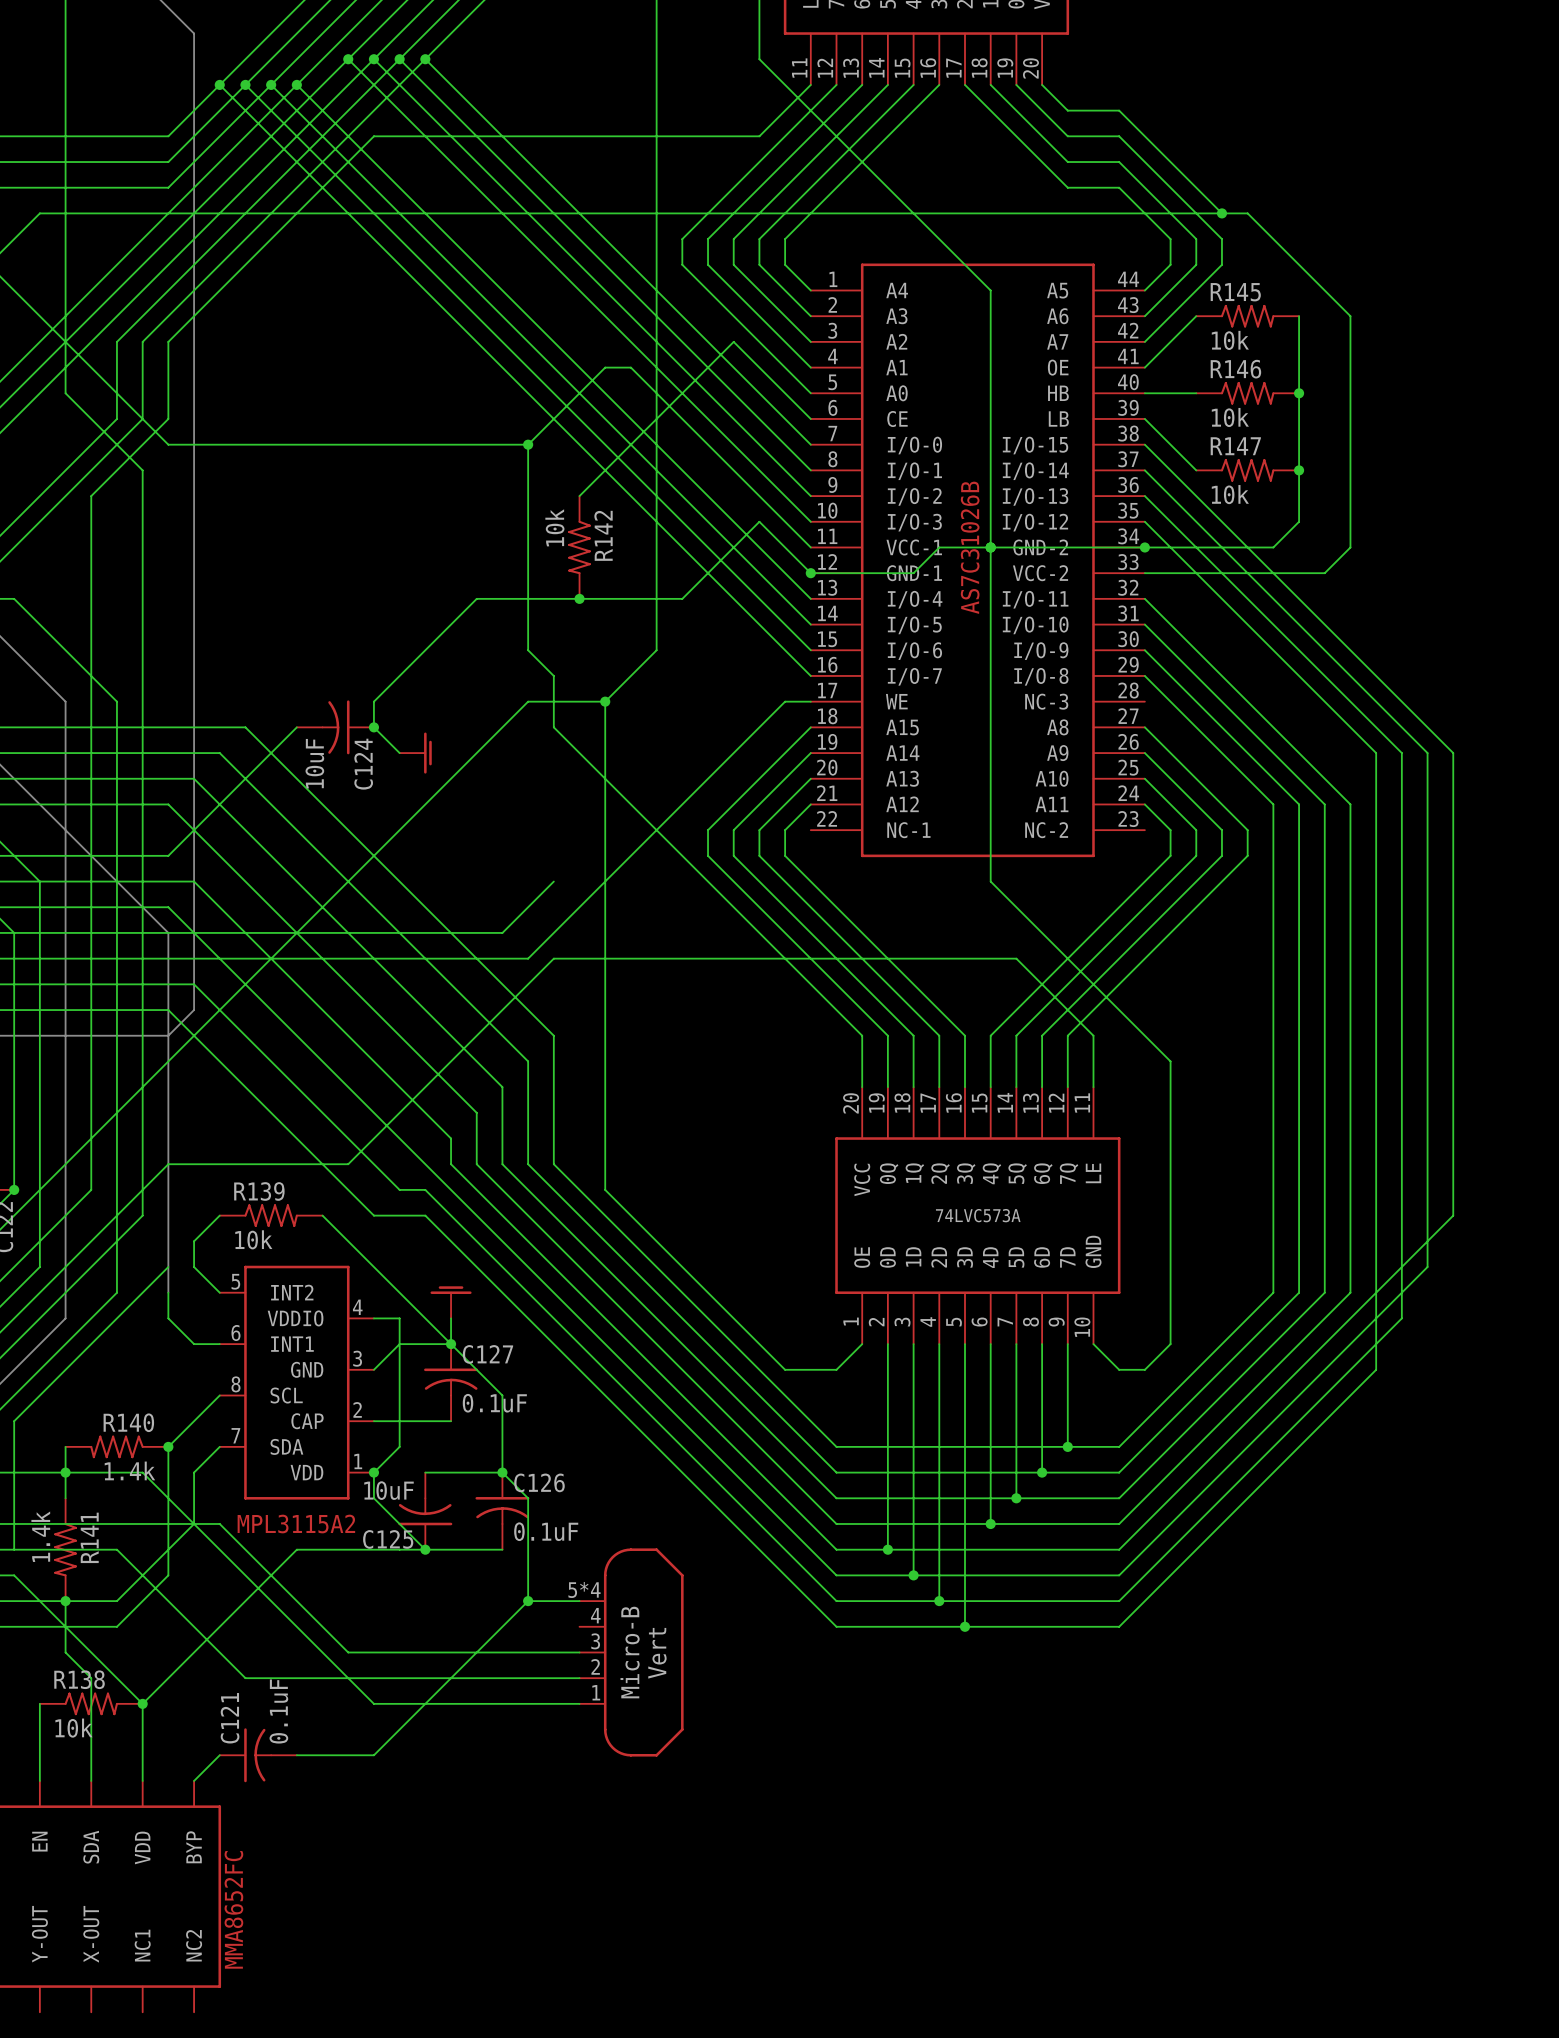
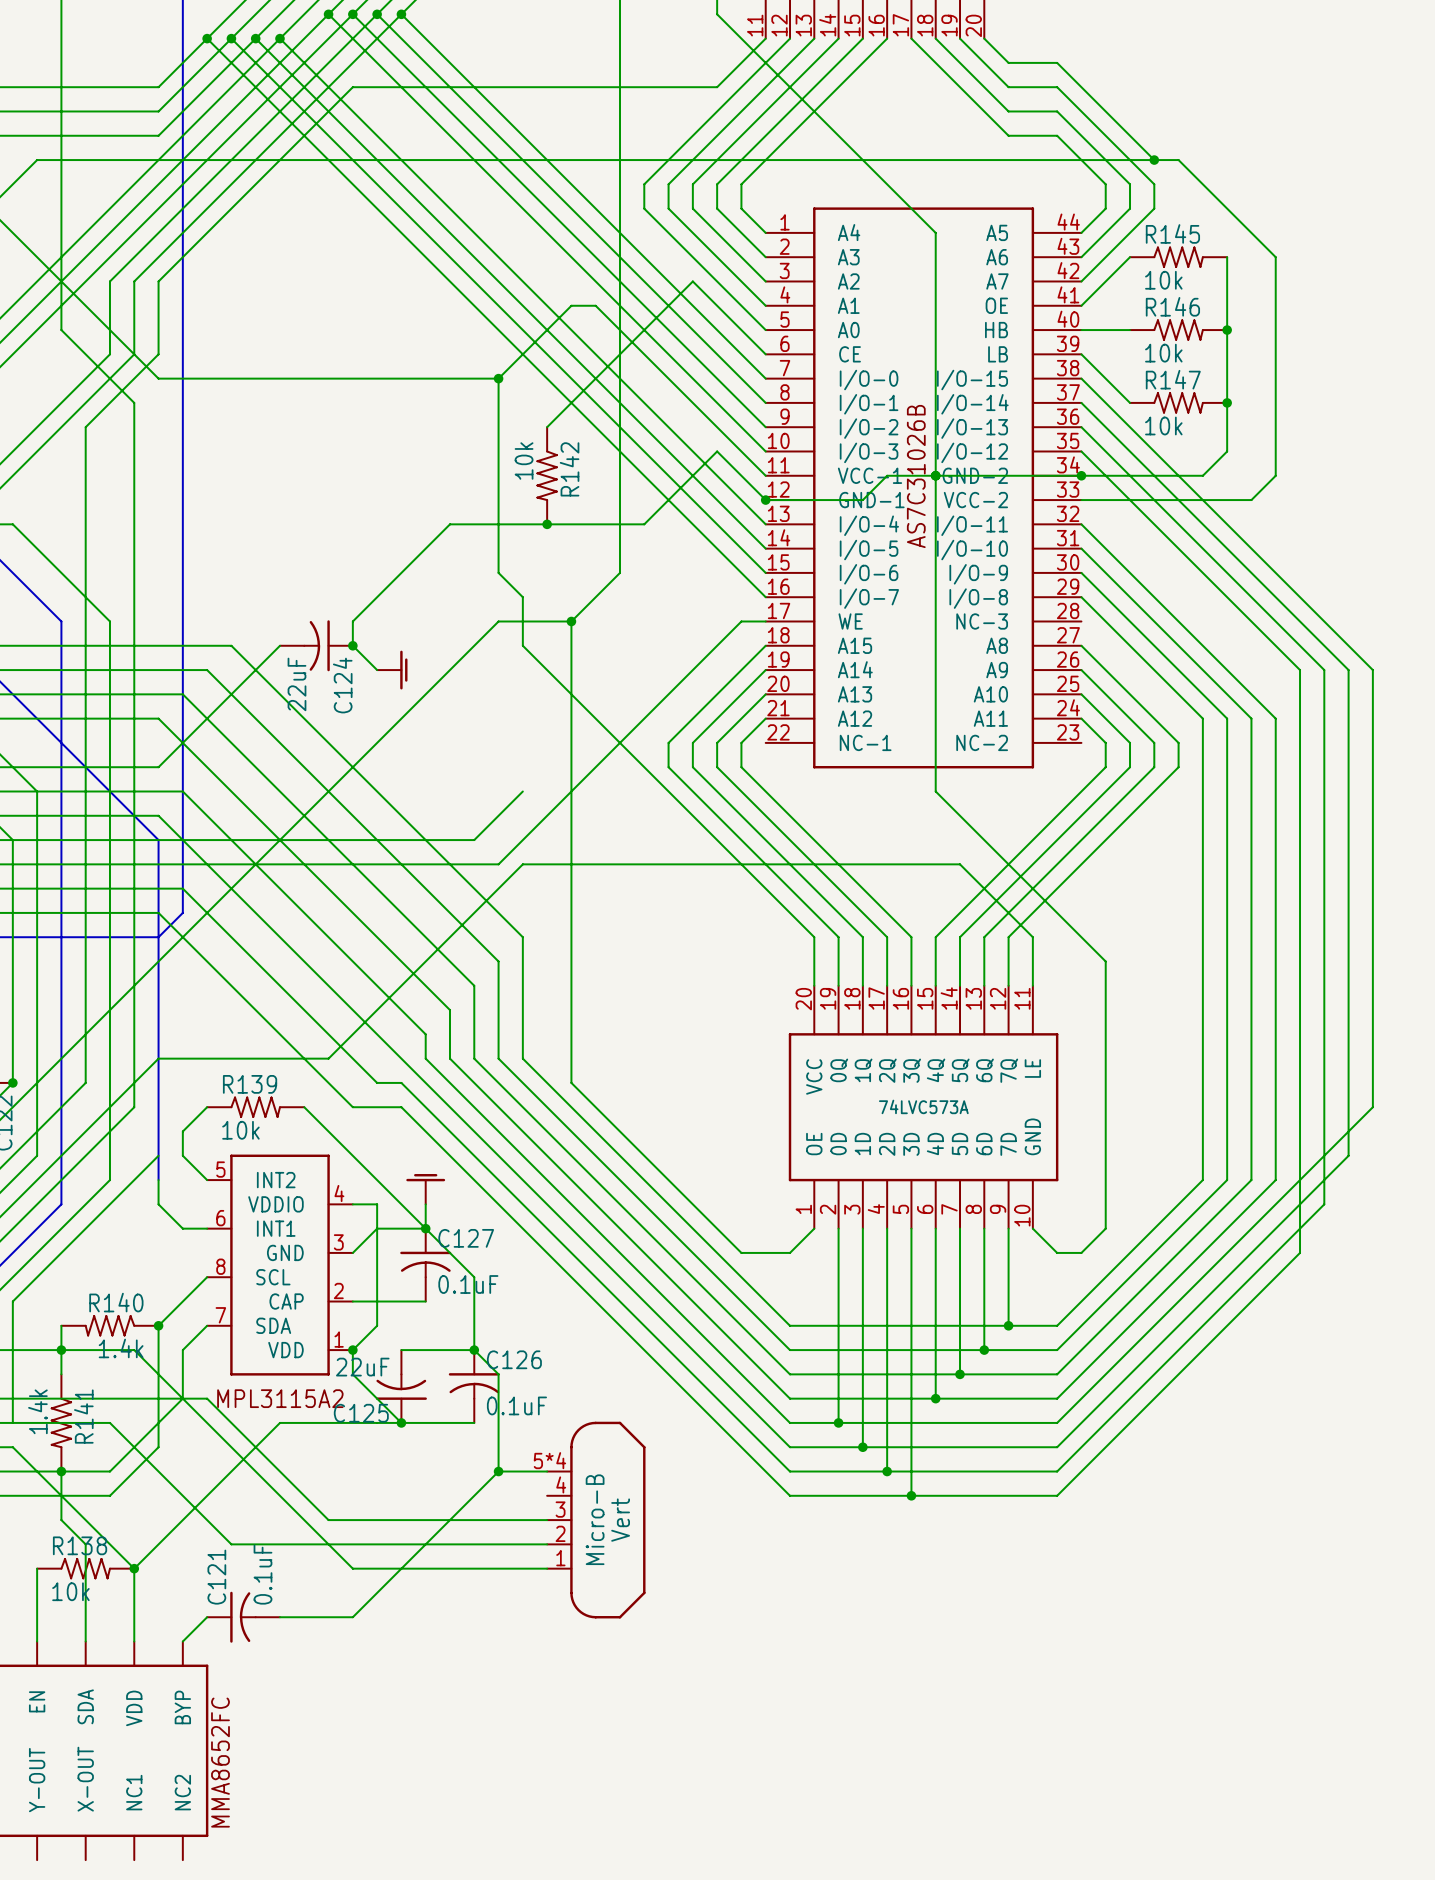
C124 value: 10uF (314, 763) -> 22uF (296, 684)
C125 value: 10uF (389, 1490) -> 22uF (362, 1367)

